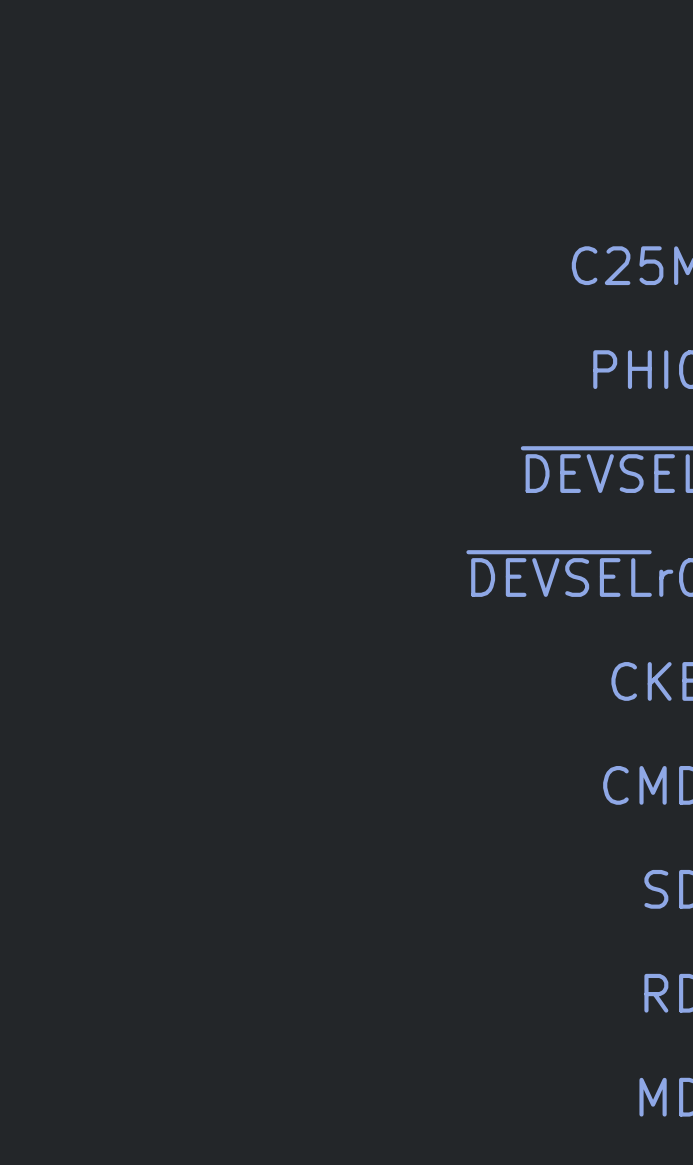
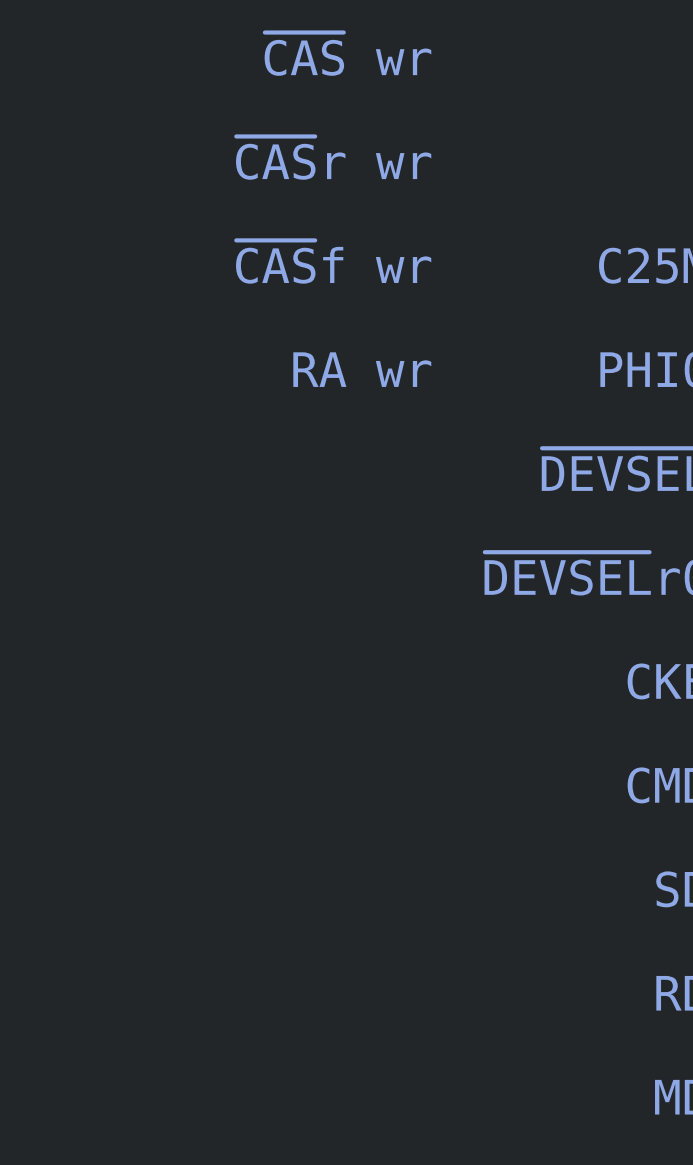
text: none -> ~{CAS} wr (347, 54)
text: none -> ~{CAS}r wr (333, 158)
text: none -> ~{CAS}f wr (333, 262)
text: none -> RA wr (362, 369)

